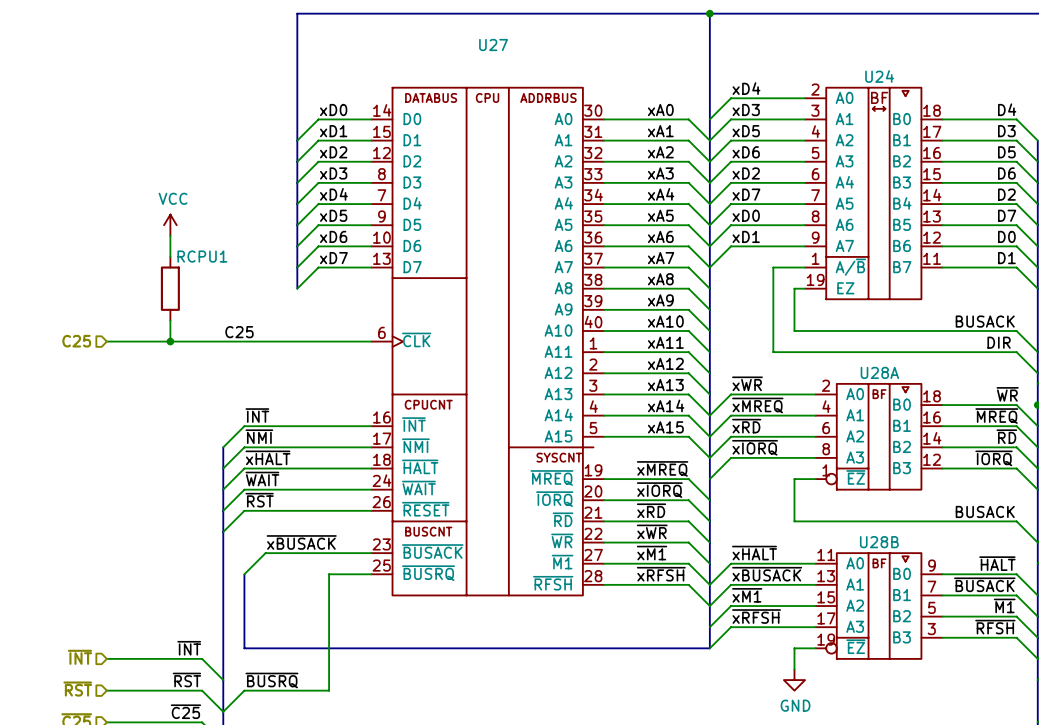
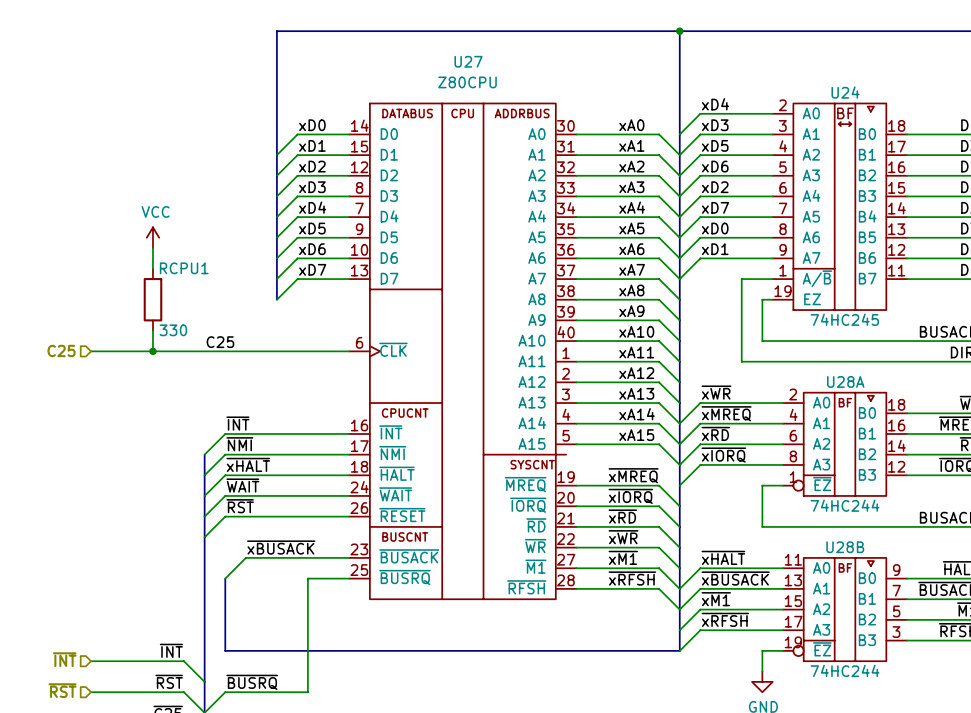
U27 value: none -> Z80CPU (467, 82)
U24 value: none -> 74HC245 (844, 319)
RCPU1 value: none -> 330 (173, 330)
U28A value: none -> 74HC244 (845, 505)
U28B value: none -> 74HC244 (845, 670)

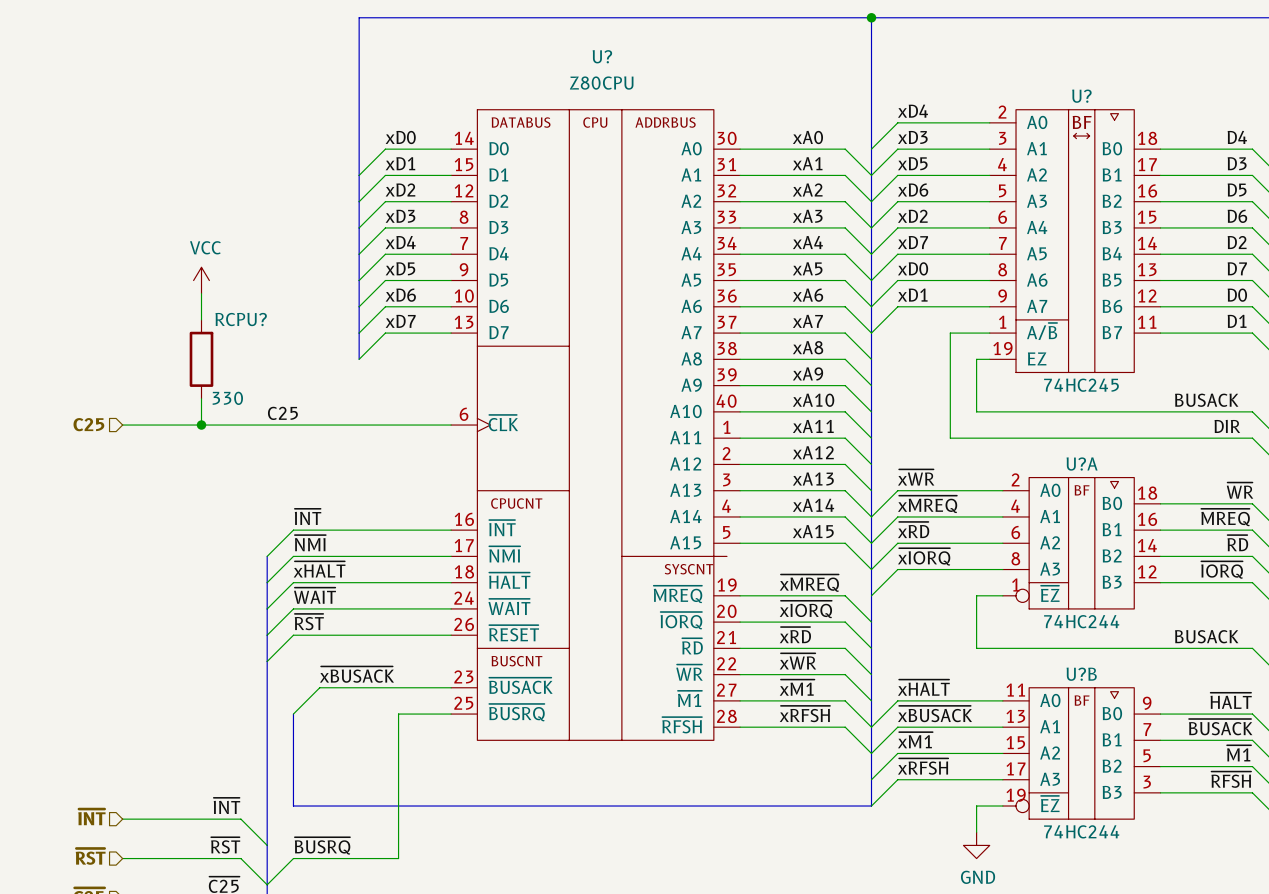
U27 name: U27 (468, 61) -> U? (602, 56)
U24 name: U24 (845, 92) -> U? (1081, 96)
RCPU1 name: RCPU1 (184, 268) -> RCPU? (241, 319)
U28A name: U28A (845, 381) -> U?A (1082, 464)
U28B name: U28B (845, 547) -> U?B (1081, 674)

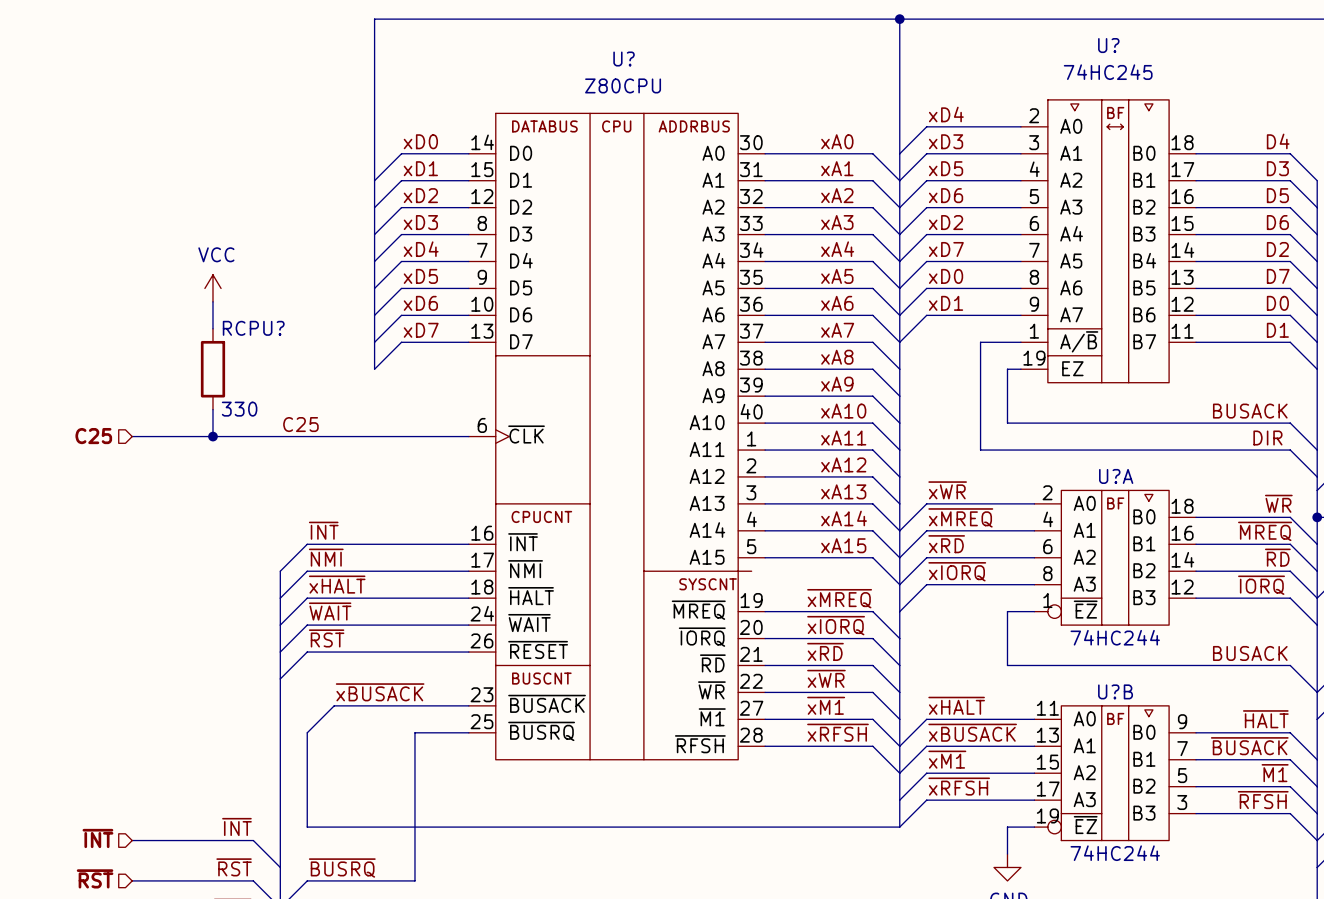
U? name position: U? (1081, 96) -> U? (1108, 45)
U? symbol: [989, 109, 1161, 373] -> [1020, 99, 1197, 383]
U? value position: 74HC245 (1081, 385) -> 74HC245 (1108, 72)

